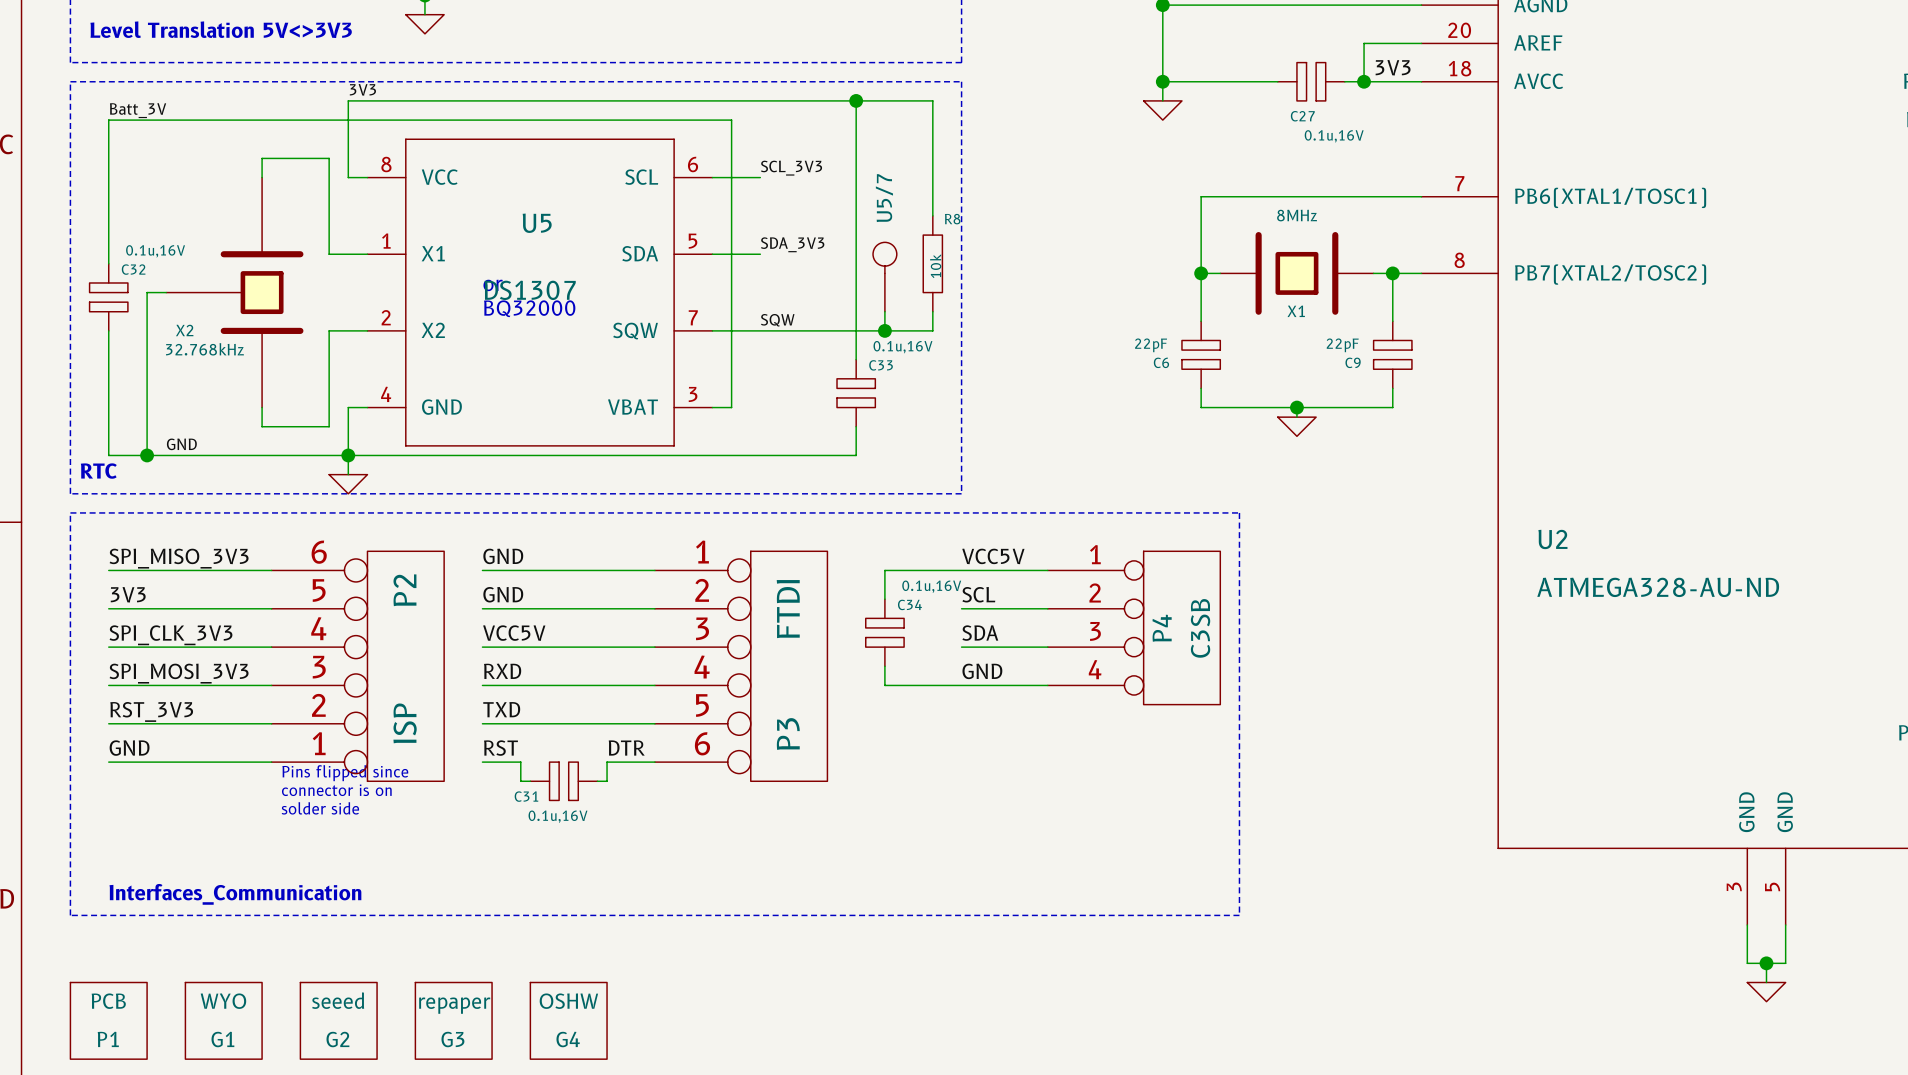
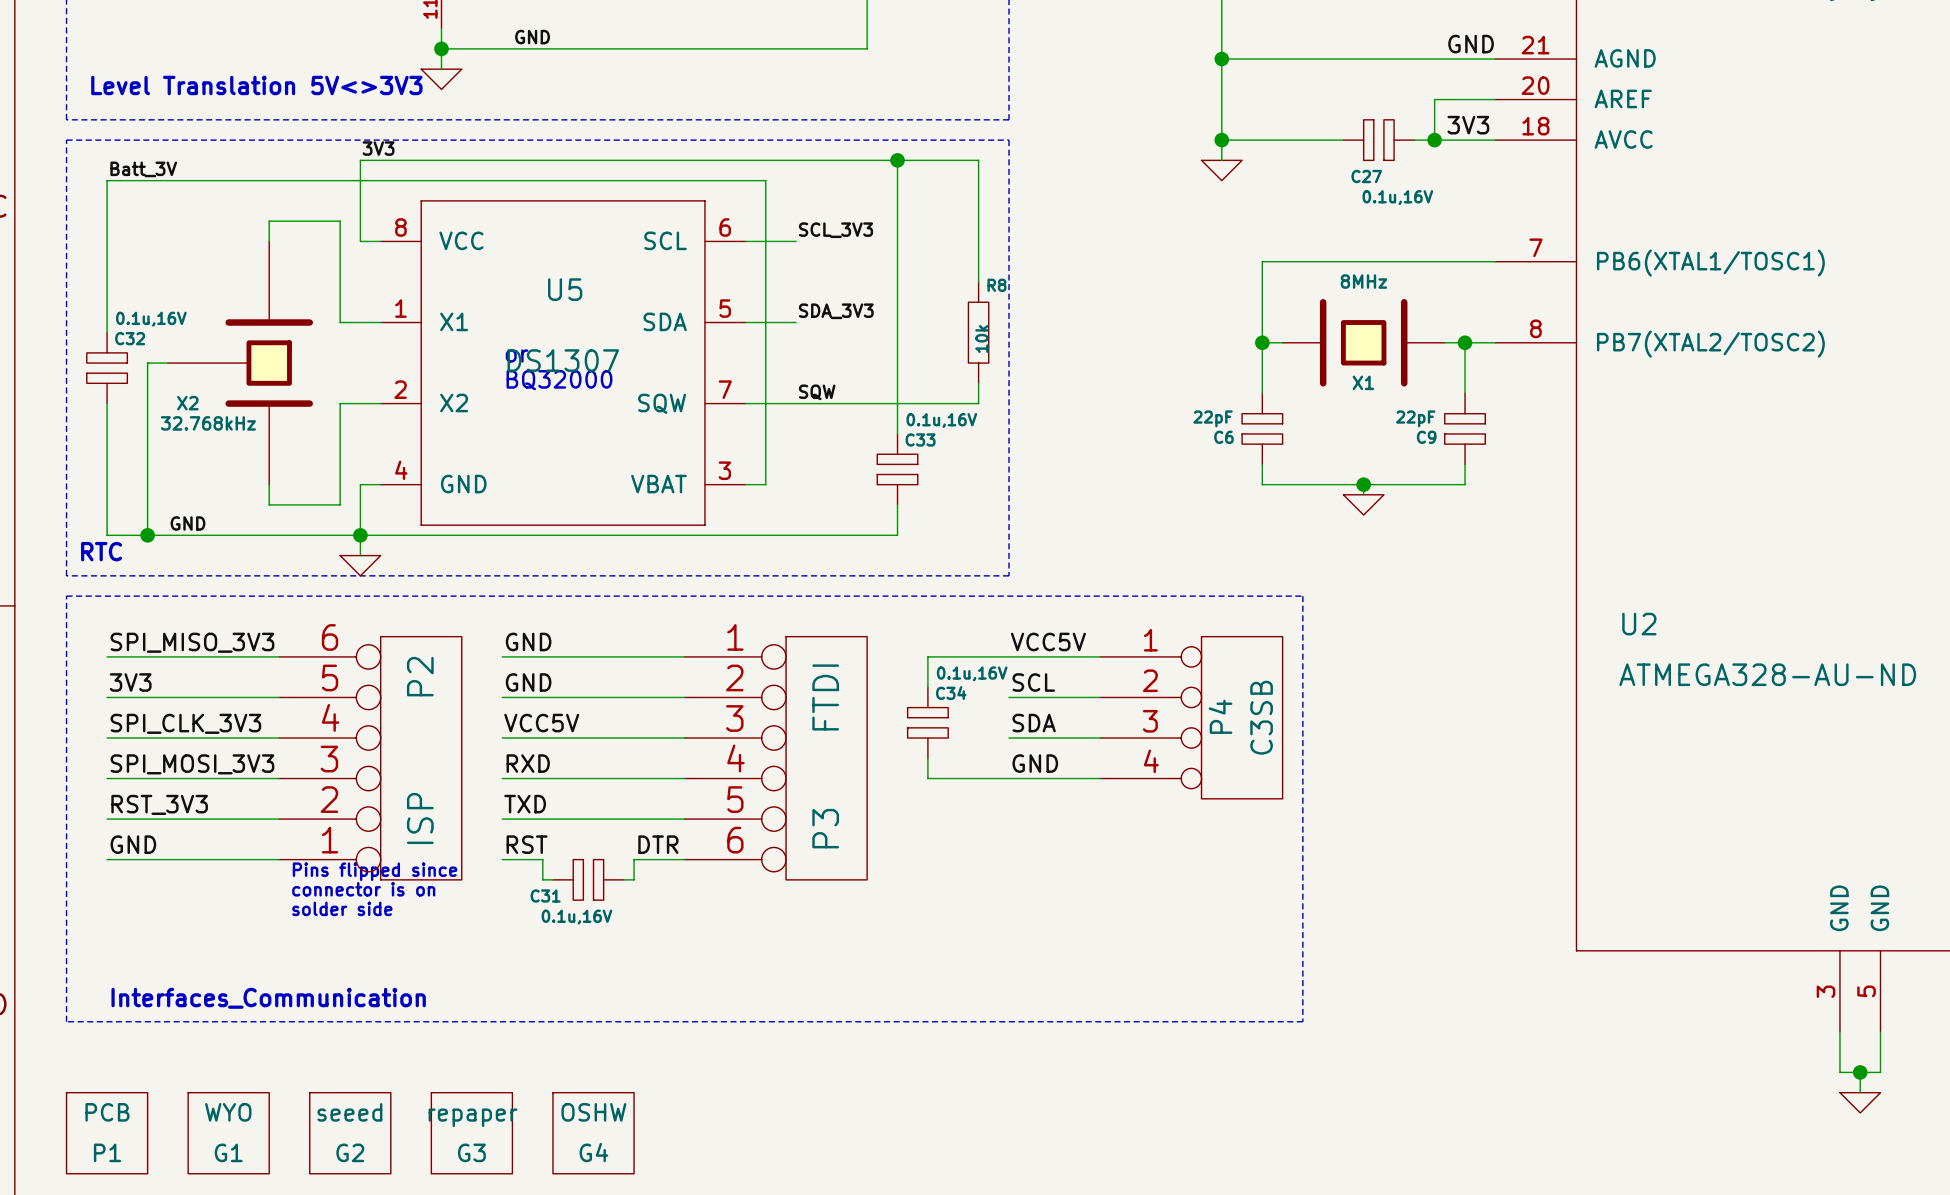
U5/7: (884, 277) -> none
wire: (884, 311) (884, 330) -> none
junction: (884, 330) -> none

